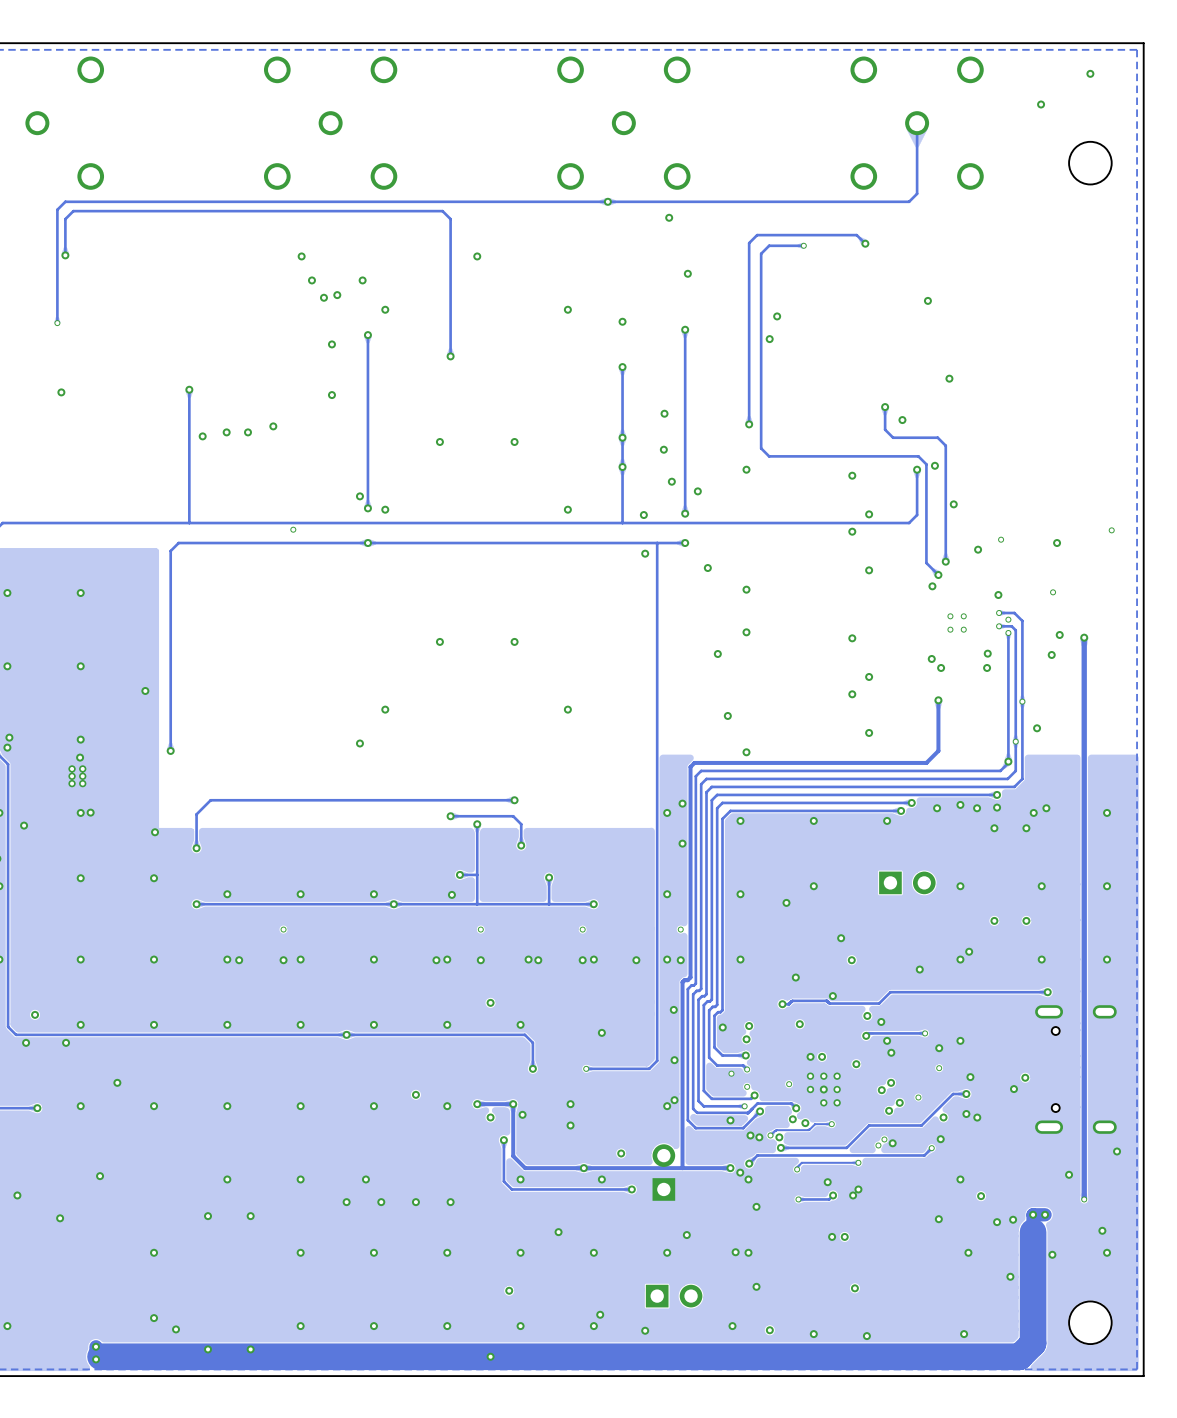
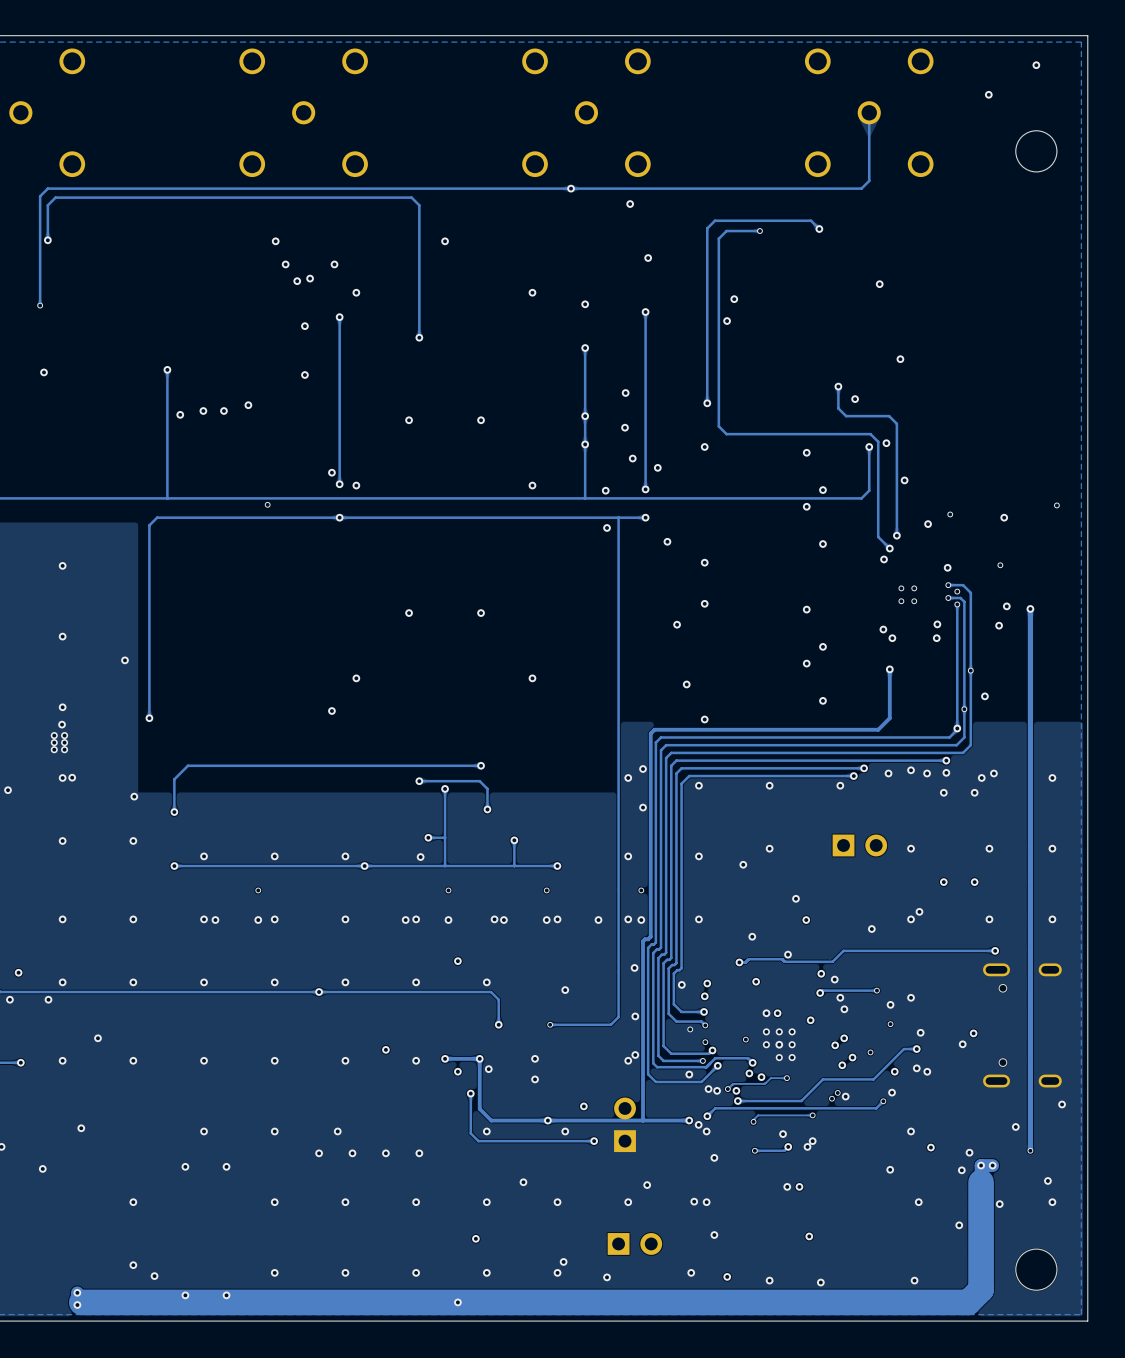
via position: (997, 1222) -> (969, 1152)

